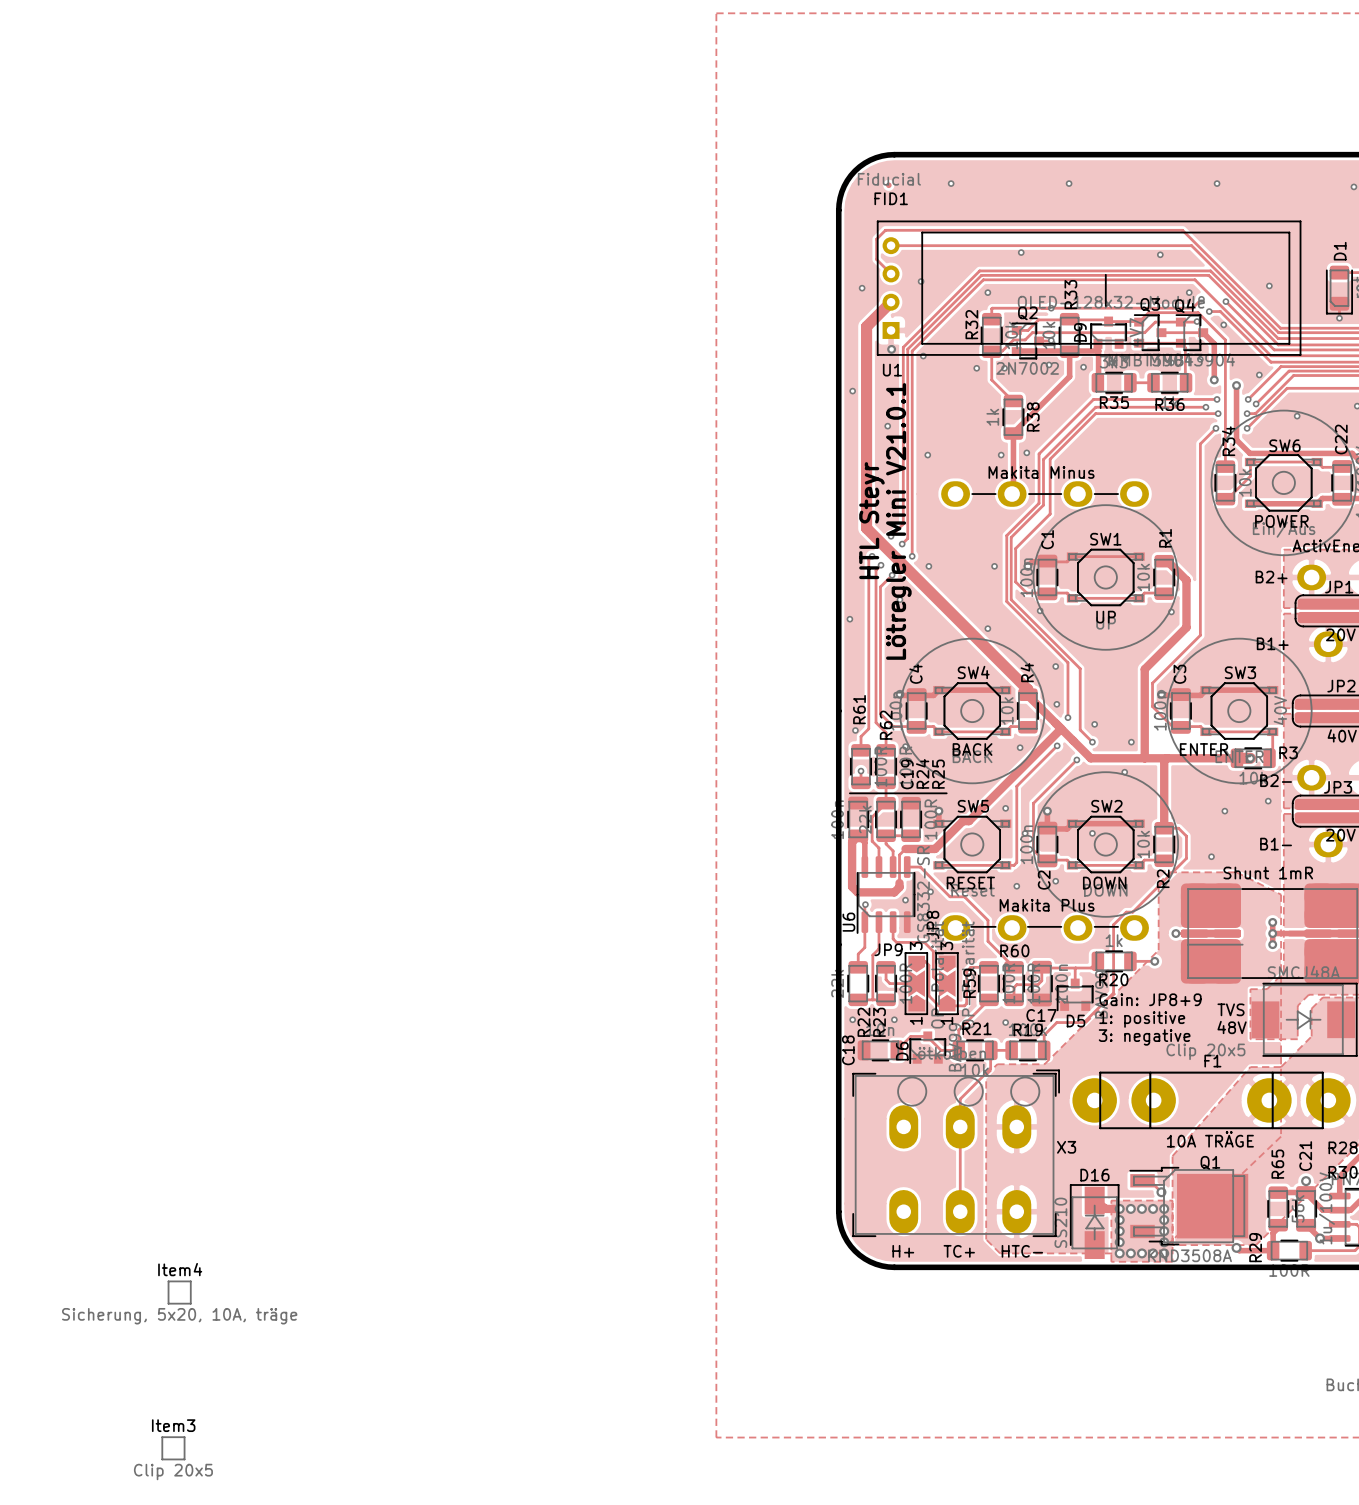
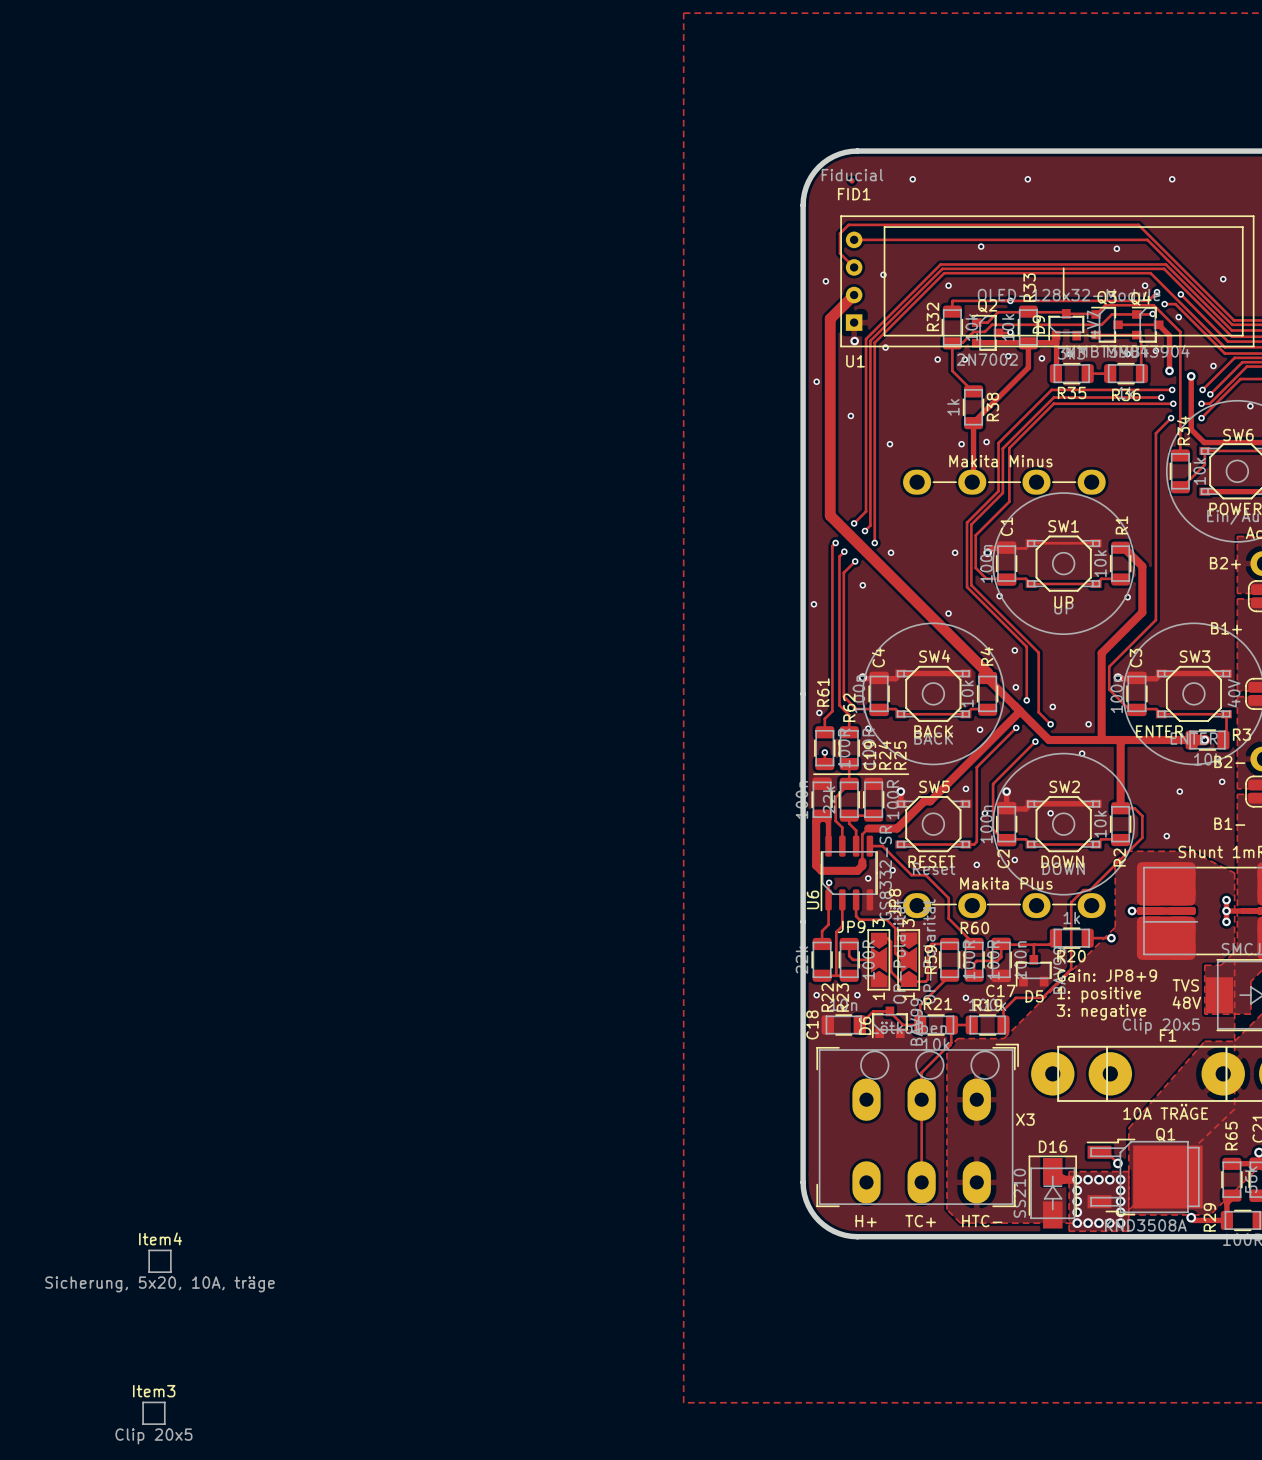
text: HTL Steyr (871, 520) -> none
text: Lötregler Mini V21.0.1 (898, 521) -> none

